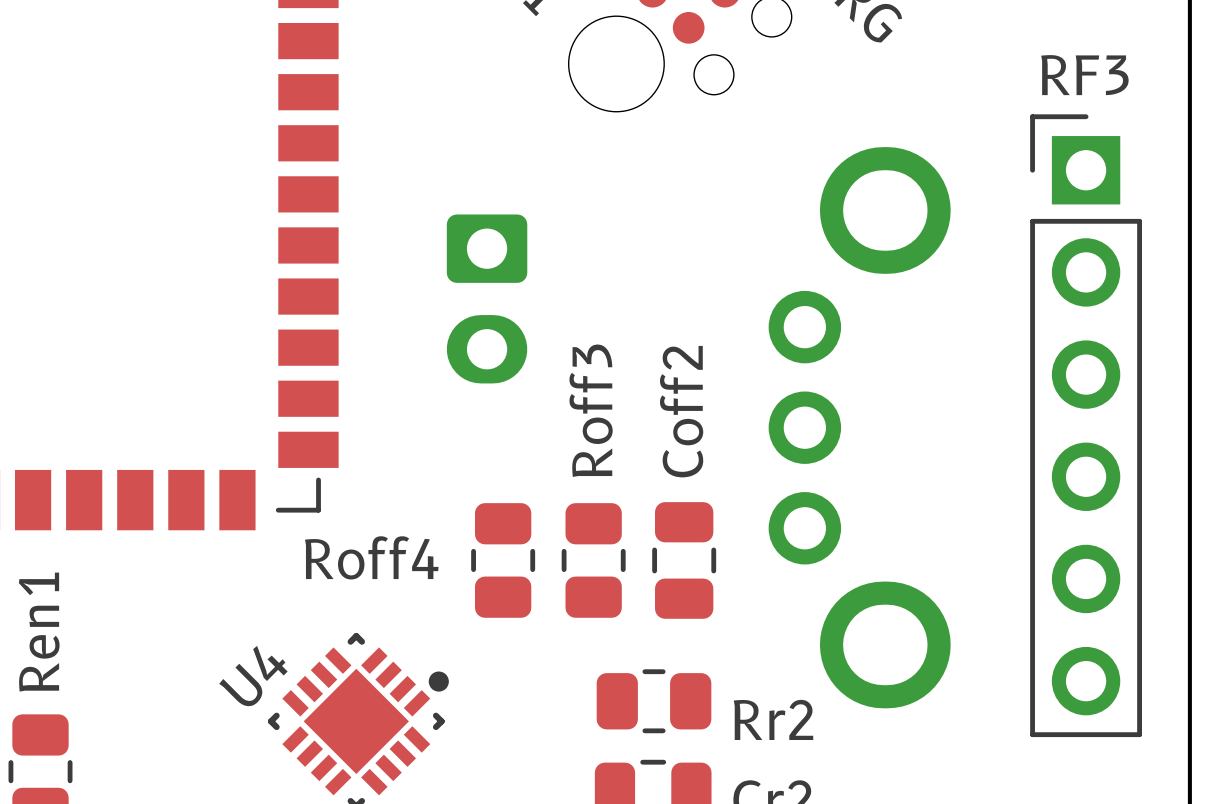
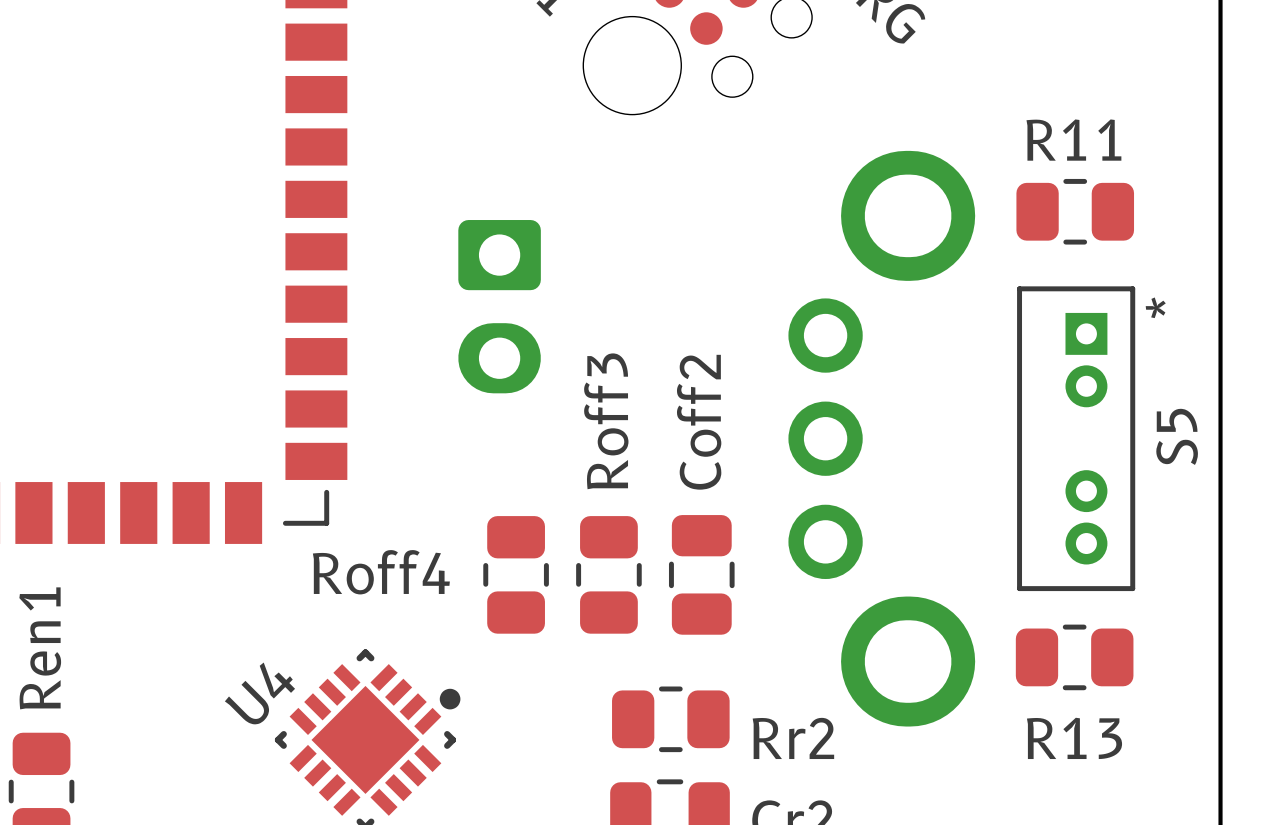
R11: none -> (1075, 211)
RF3: (1086, 425) -> none
S5: none -> (1076, 438)
R13: none -> (1074, 657)

